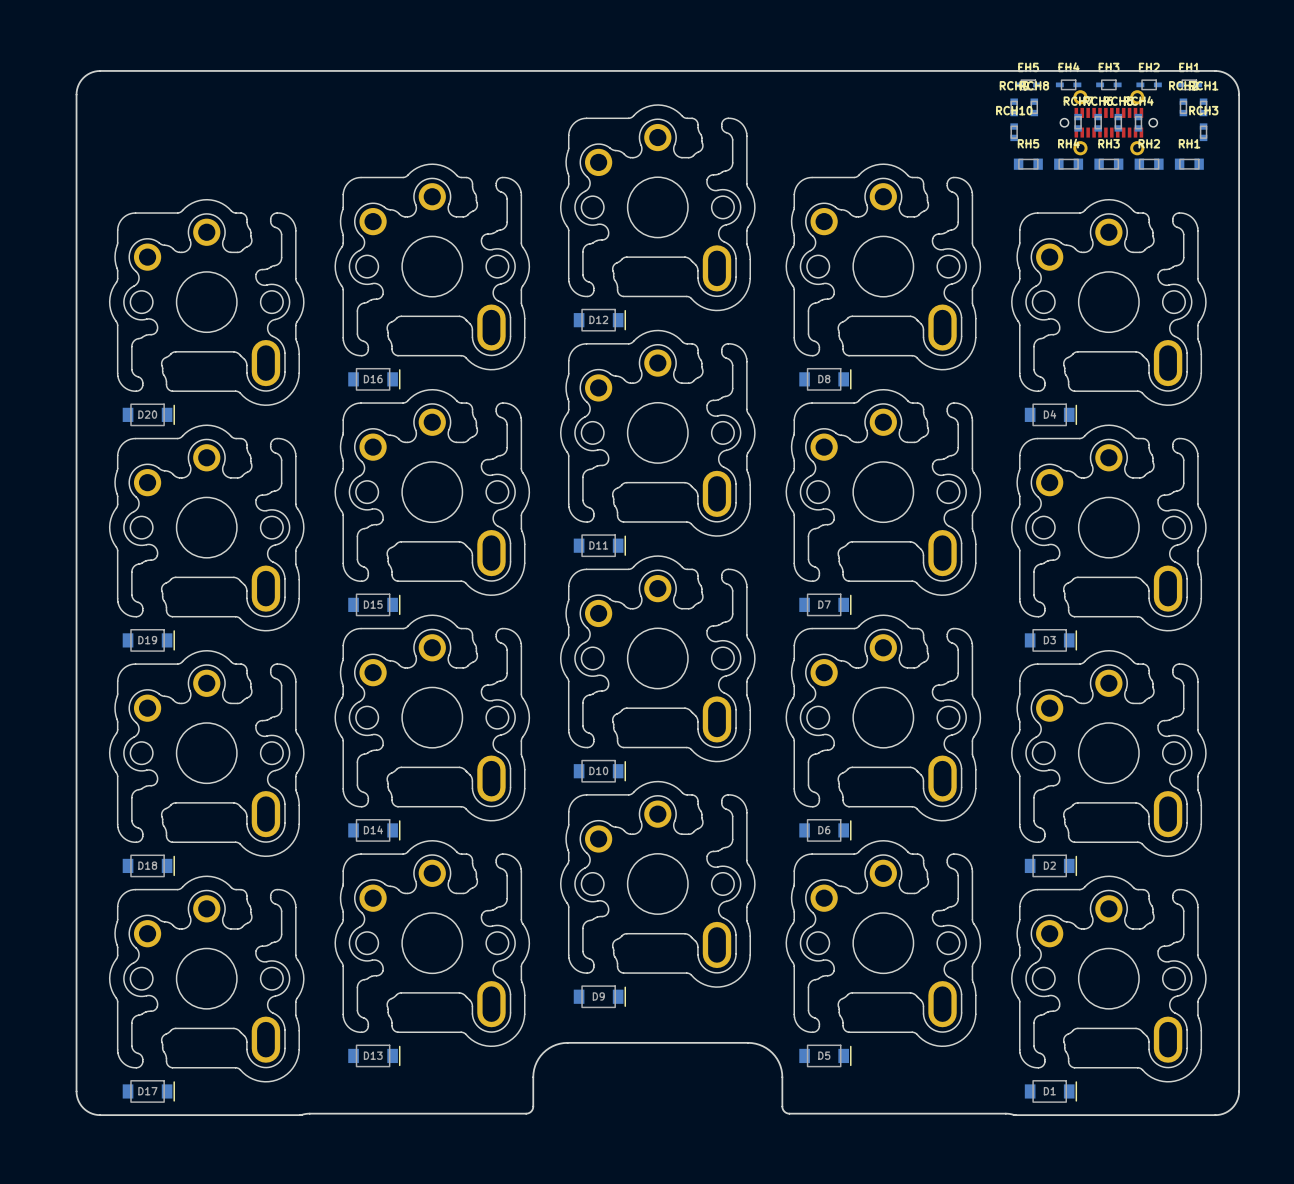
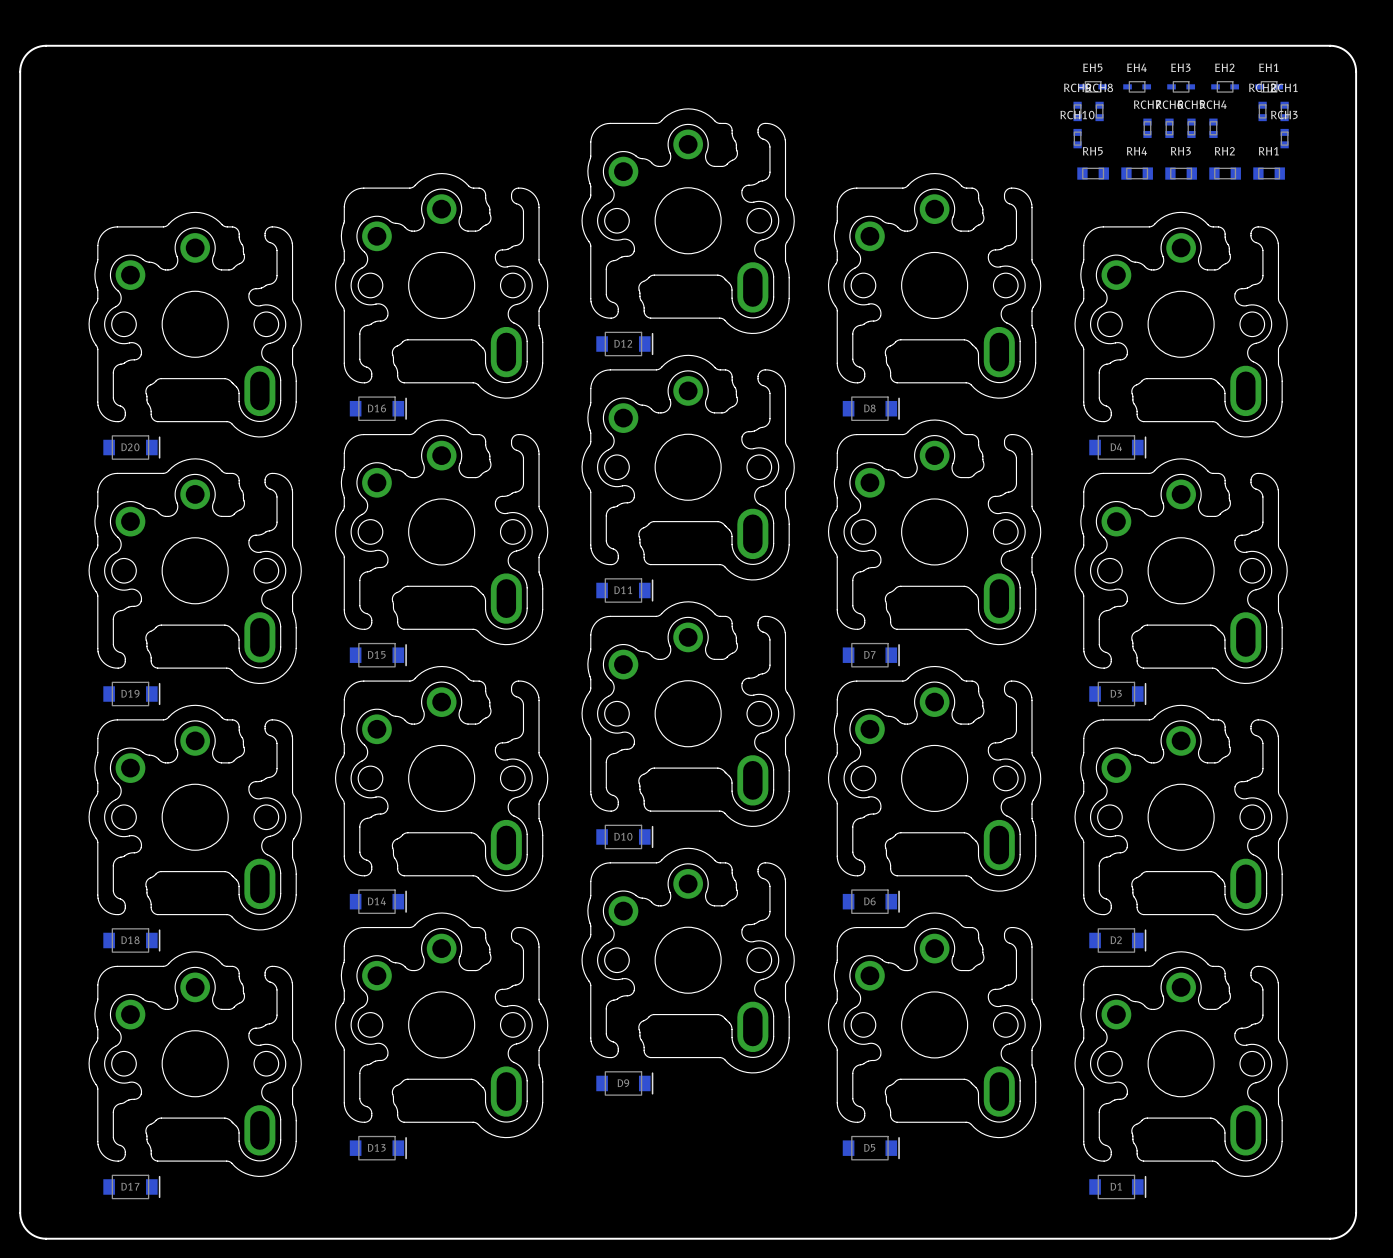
board edge: none -> (1330, 45) (46, 45) (37, 47) (27, 53) (21, 63) (20, 71) (20, 1212) (22, 1224) (27, 1231) (34, 1236) (46, 1238) (1330, 1238) (1341, 1236) (1348, 1231) (1354, 1221) (1356, 1212) (1356, 71) (1354, 63) (1348, 53) (1338, 47) (1330, 45)
part: (1108, 122) -> none
board edge: (1015, 1115) (787, 1113) (782, 1108) (782, 1073) (777, 1058) (766, 1048) (748, 1042) (567, 1042) (556, 1044) (546, 1050) (536, 1062) (533, 1073) (533, 1108) (526, 1113) (299, 1115) -> none
board edge: (1015, 1115) (1218, 1114) (1230, 1109) (1238, 1096) (1239, 94) (1233, 79) (1220, 71) (100, 70) (89, 73) (81, 79) (76, 94) (77, 1096) (83, 1108) (97, 1114) (299, 1115) -> none

